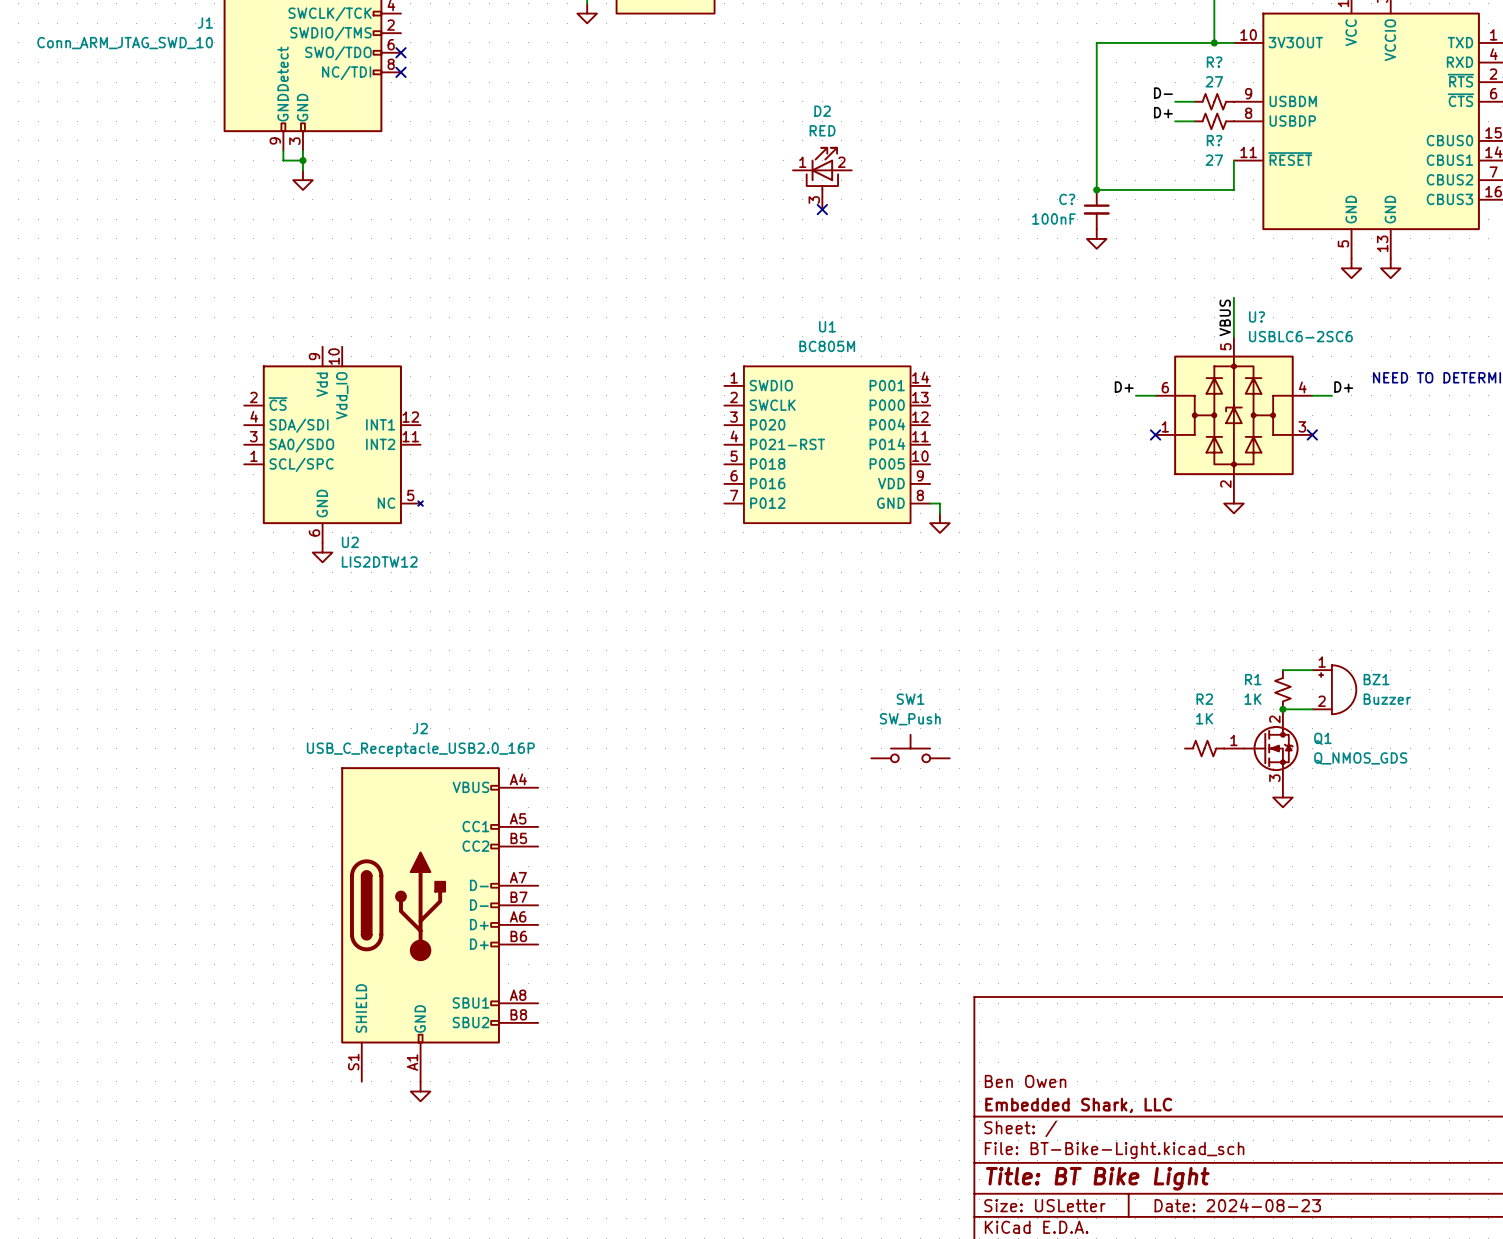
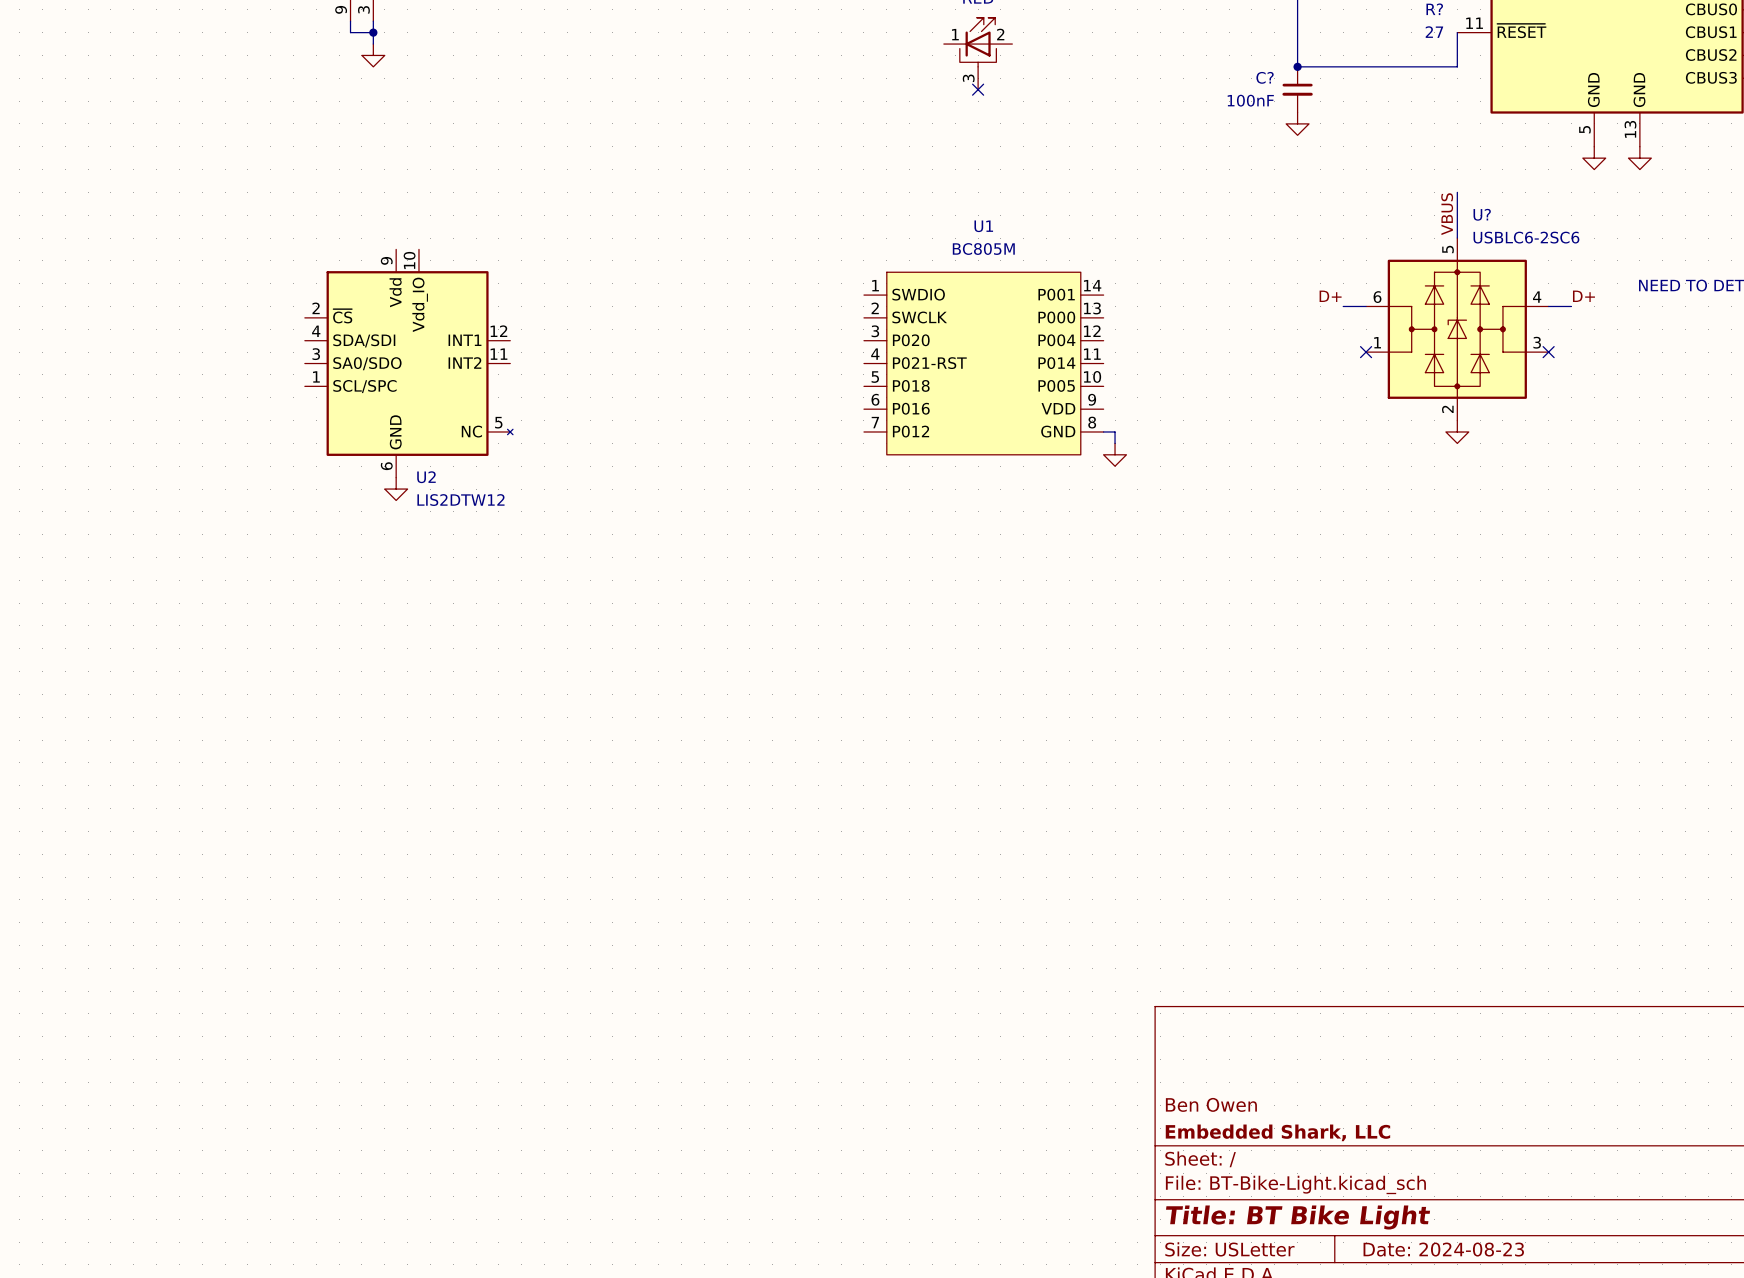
wire: (1282, 670) (1312, 670) -> none
R1: 1K (1282, 689) -> none
BZ1: Buzzer (1334, 689) -> none
wire: (1282, 709) (1312, 709) -> none
junction: (1282, 709) -> none
SW1: SW_Push (910, 748) -> none
R2: 1K (1204, 748) -> none
Q1: Q_NMOS_GDS (1261, 748) -> none
power symbol: (1282, 797) -> none
J2: USB_C_Receptacle_USB2.0_16P (439, 924) -> none
power symbol: (420, 1091) -> none

